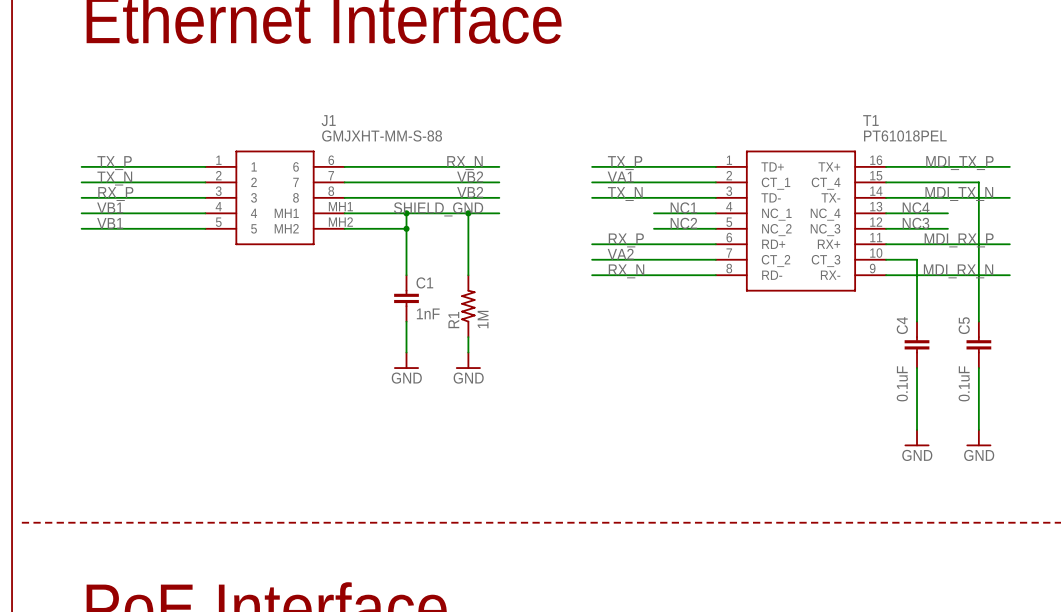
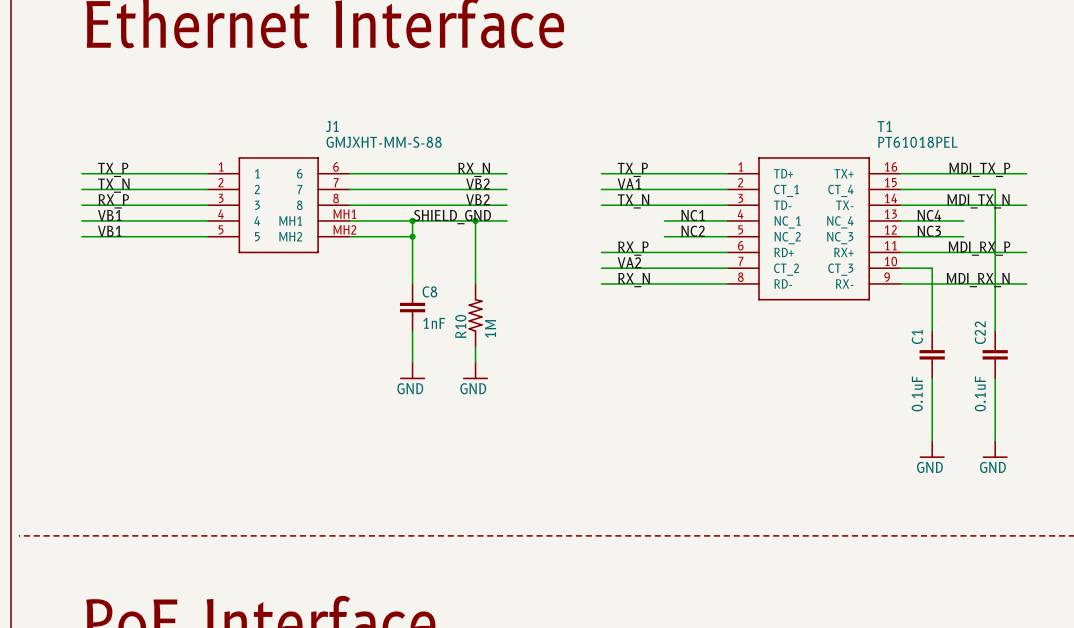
C1 name: C1 (424, 282) -> C8 (429, 291)
R1 name: R1 (453, 320) -> R10 (460, 326)
C4 name: C4 (902, 325) -> C1 (917, 336)
C5 name: C5 (964, 325) -> C22 (980, 332)

